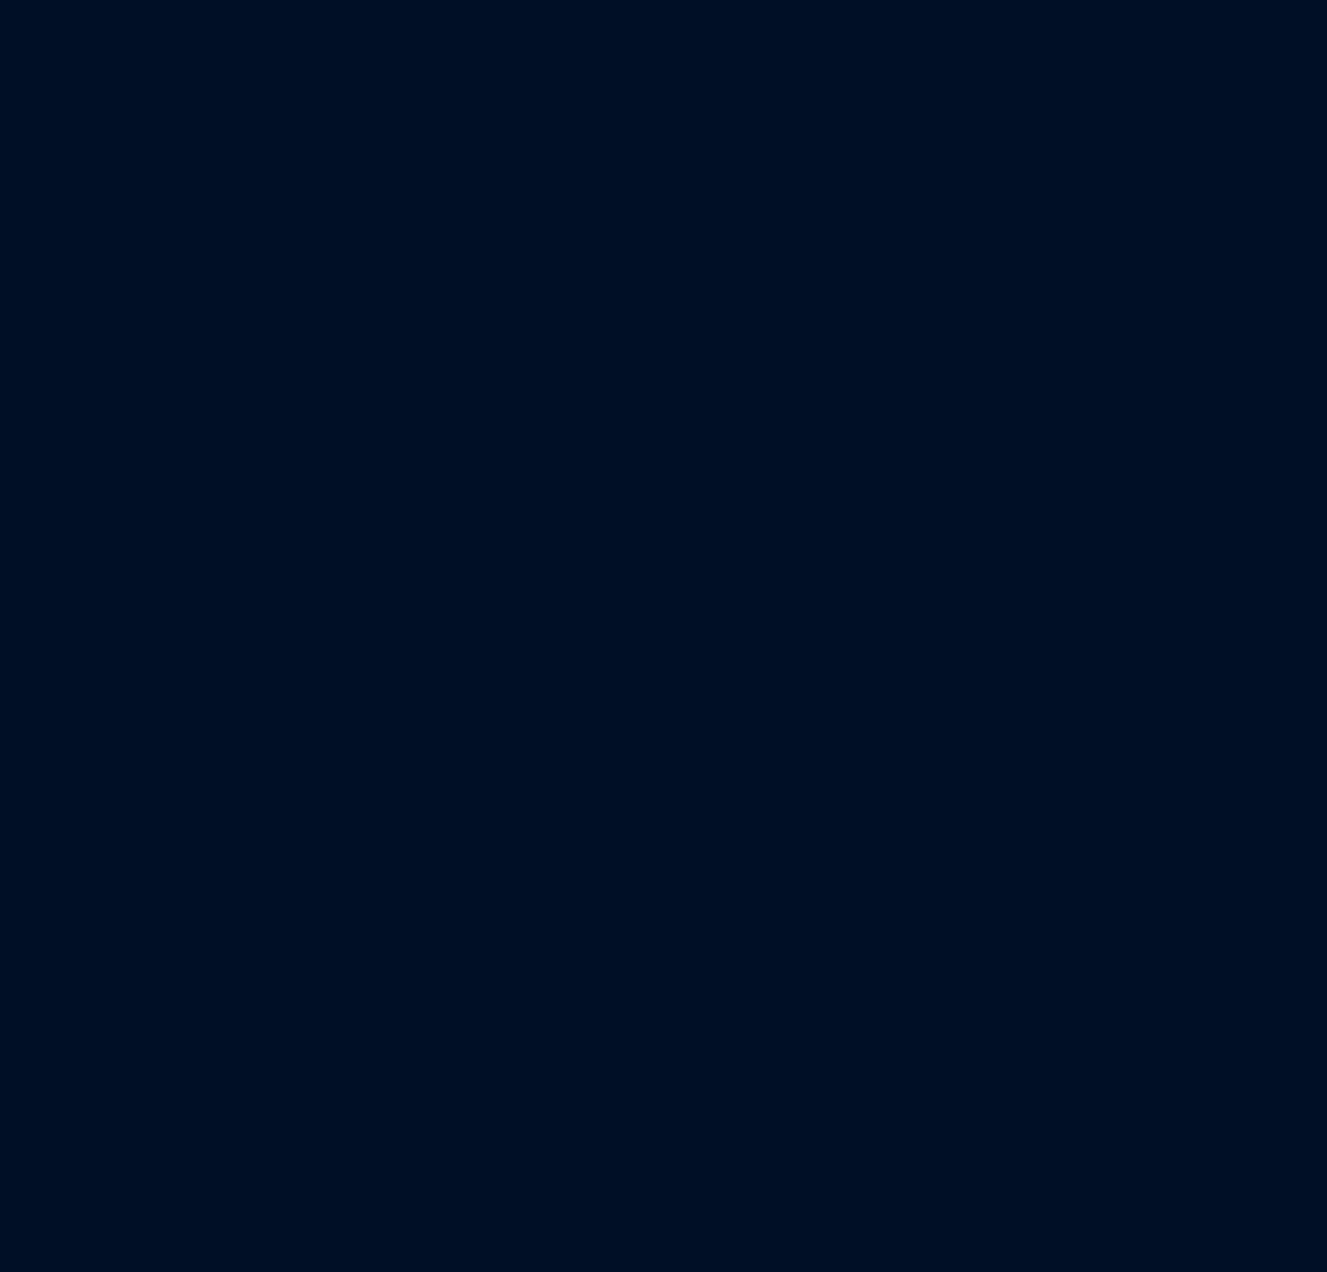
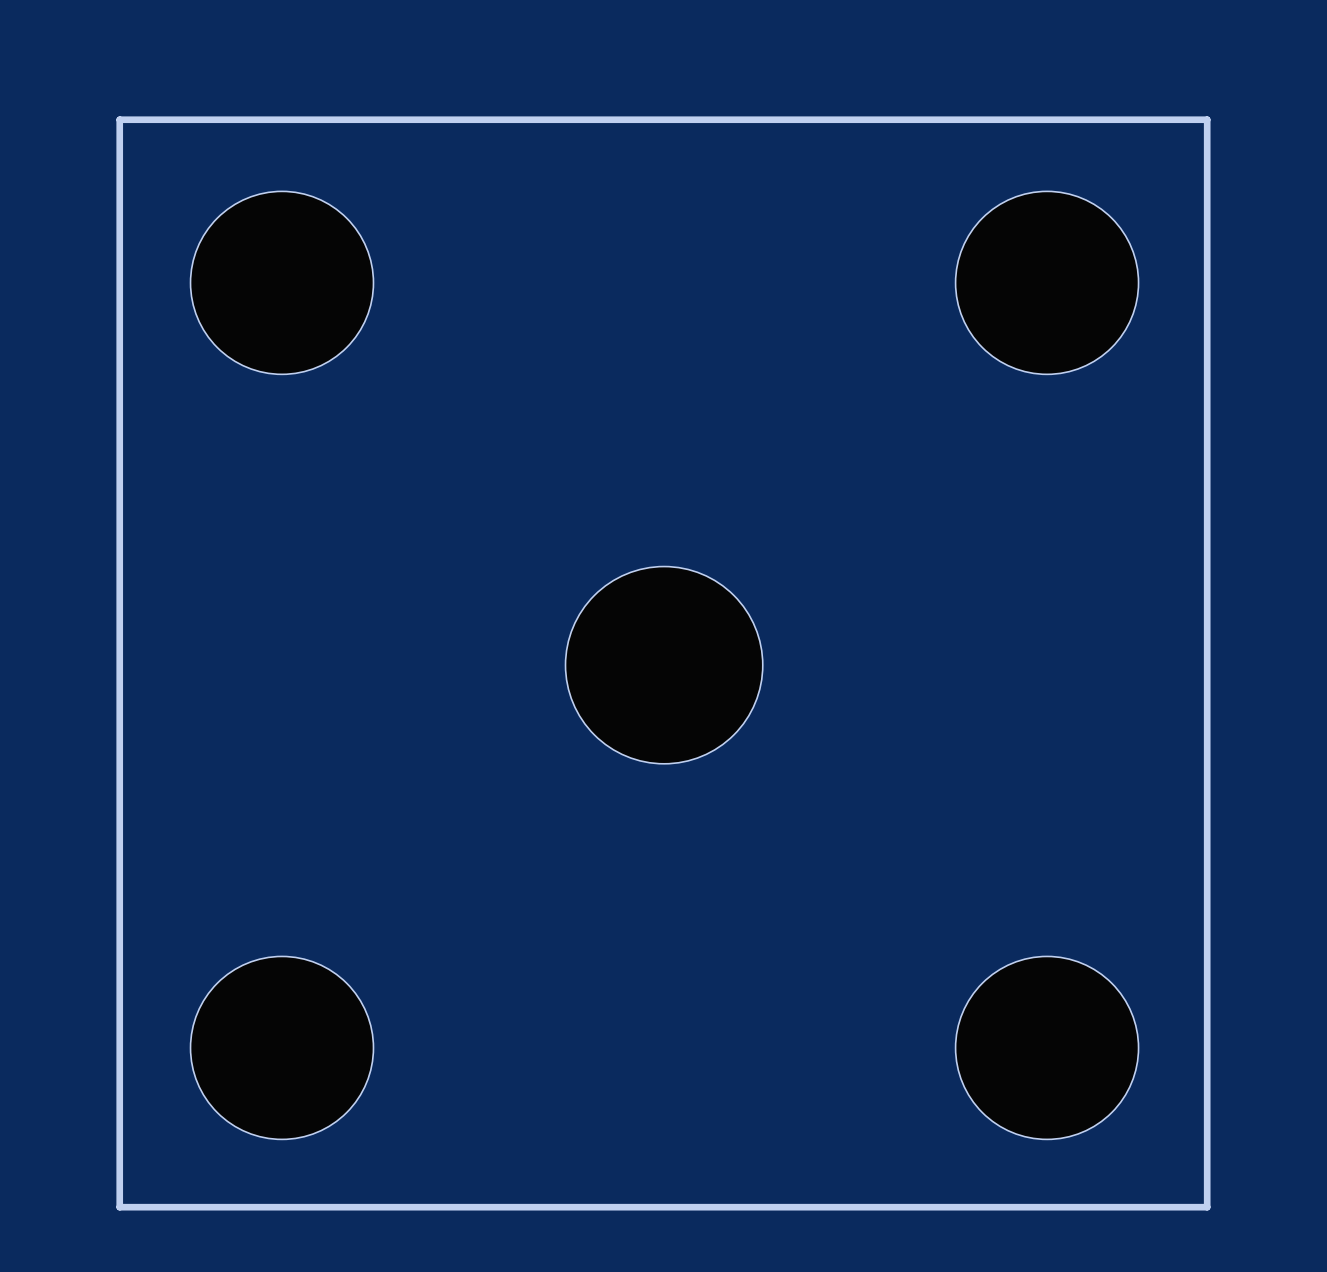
board edge: none -> (1207, 119) (119, 119) (119, 1207) (1207, 1207) (1207, 119)
hole: none -> (282, 282)
hole: none -> (1047, 282)
hole: none -> (664, 665)
hole: none -> (282, 1047)
hole: none -> (1047, 1047)

